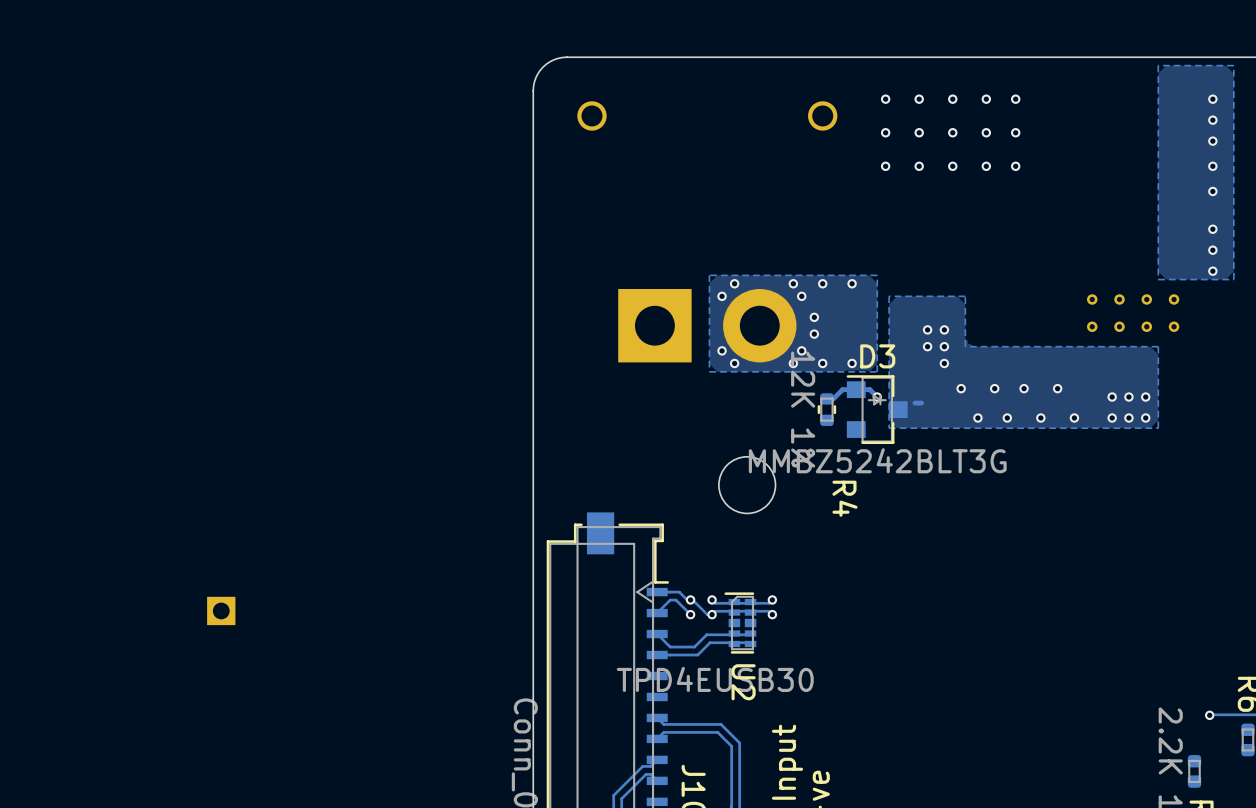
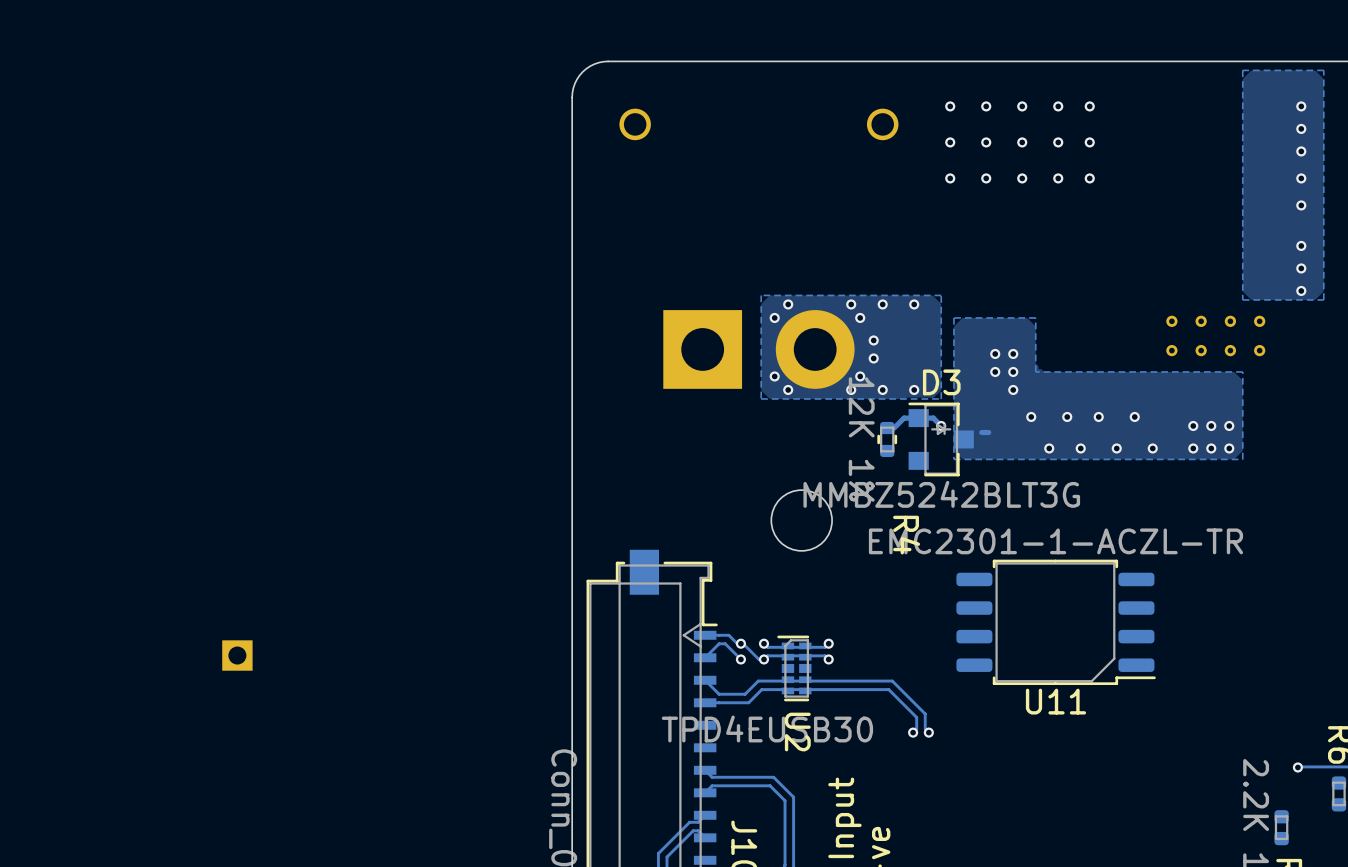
U11: none -> EMC2301-1-ACZL-TR (1056, 622)
track: none -> (806, 681) (892, 681) (925, 713) (925, 729) (928, 732)
track: none -> (806, 689) (888, 689) (916, 717) (916, 729) (913, 732)
via: none -> (913, 732)
via: none -> (928, 732)

